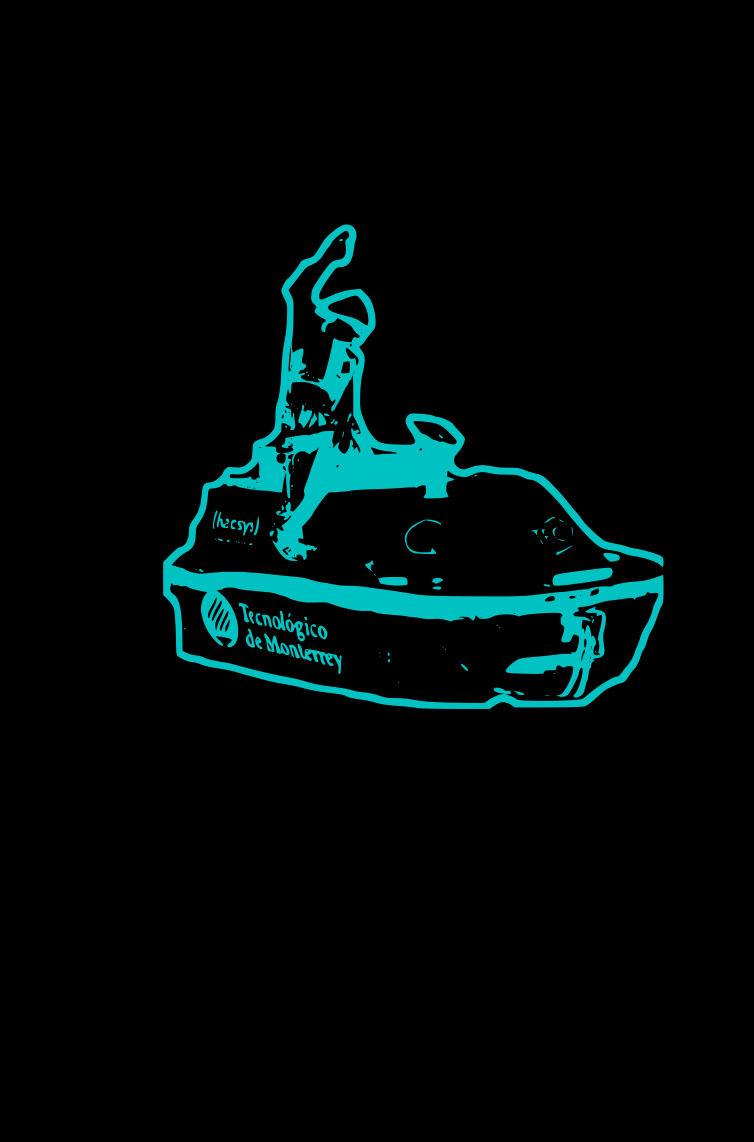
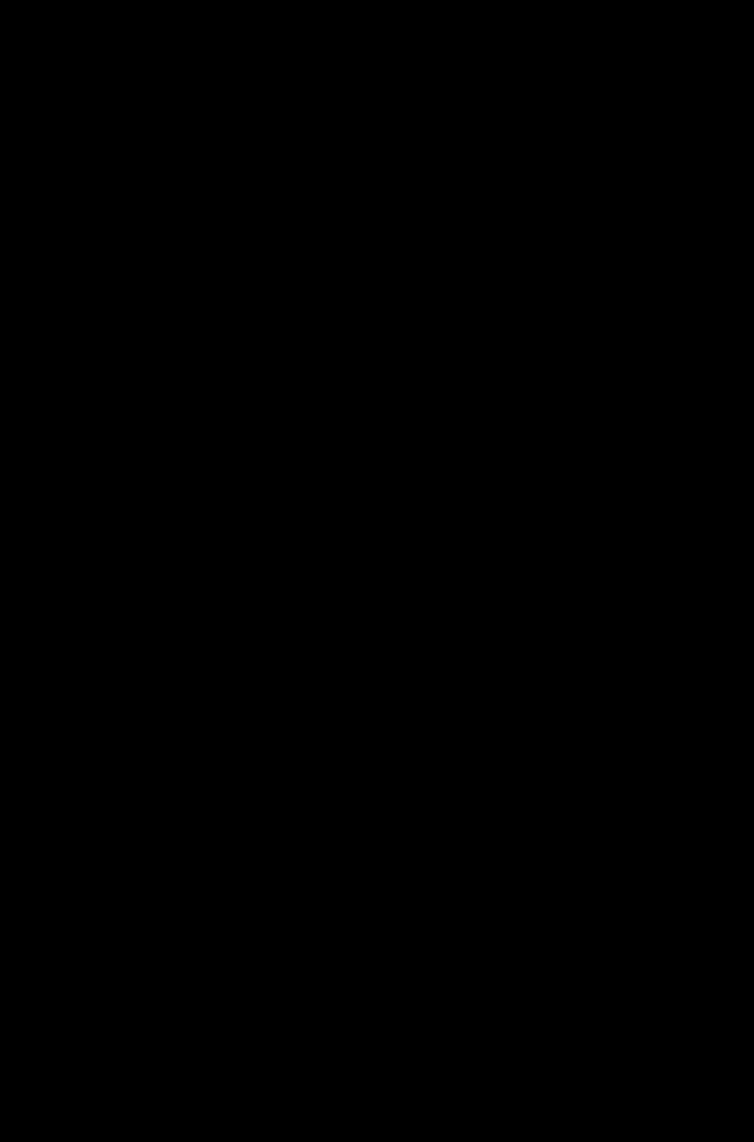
drawing: [163, 224, 664, 709] -> none

